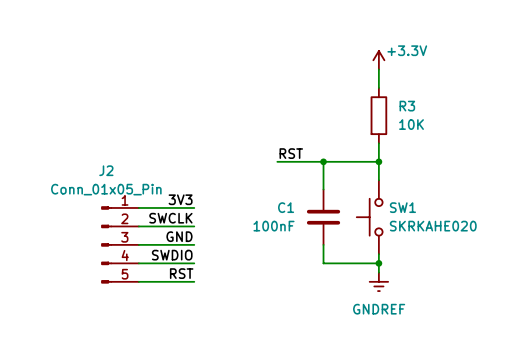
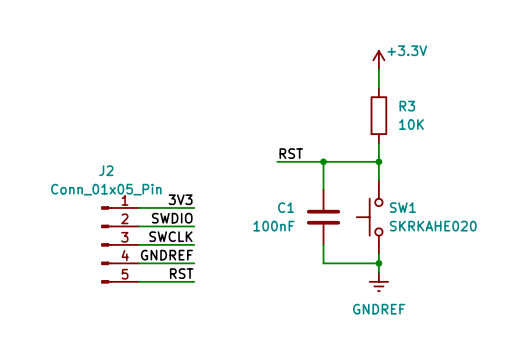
label: SWCLK (170, 218) -> SWDIO (172, 218)
label: GND (179, 236) -> SWCLK (170, 236)
label: SWDIO (172, 255) -> GNDREF (166, 255)

